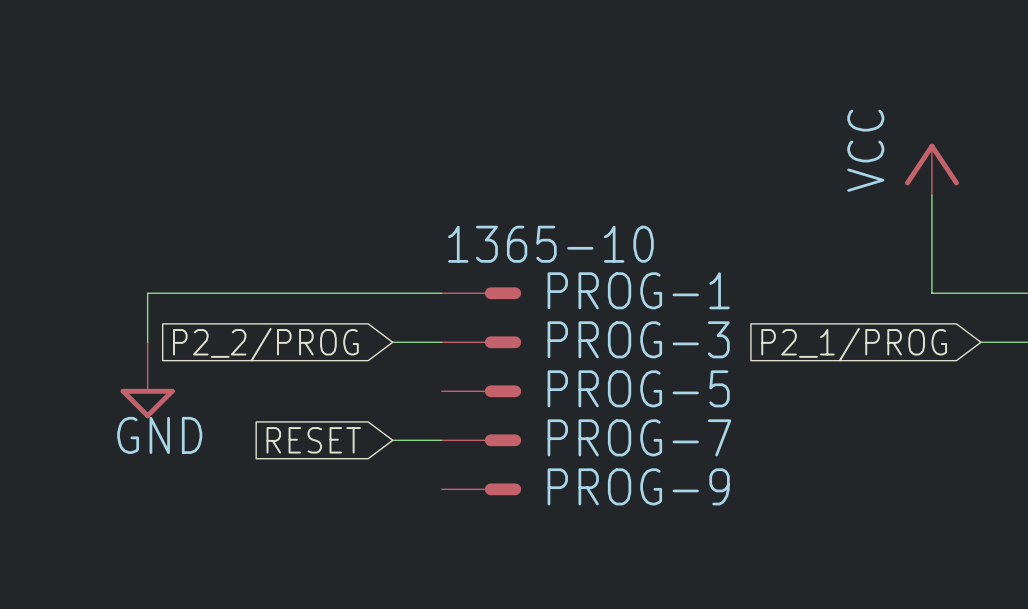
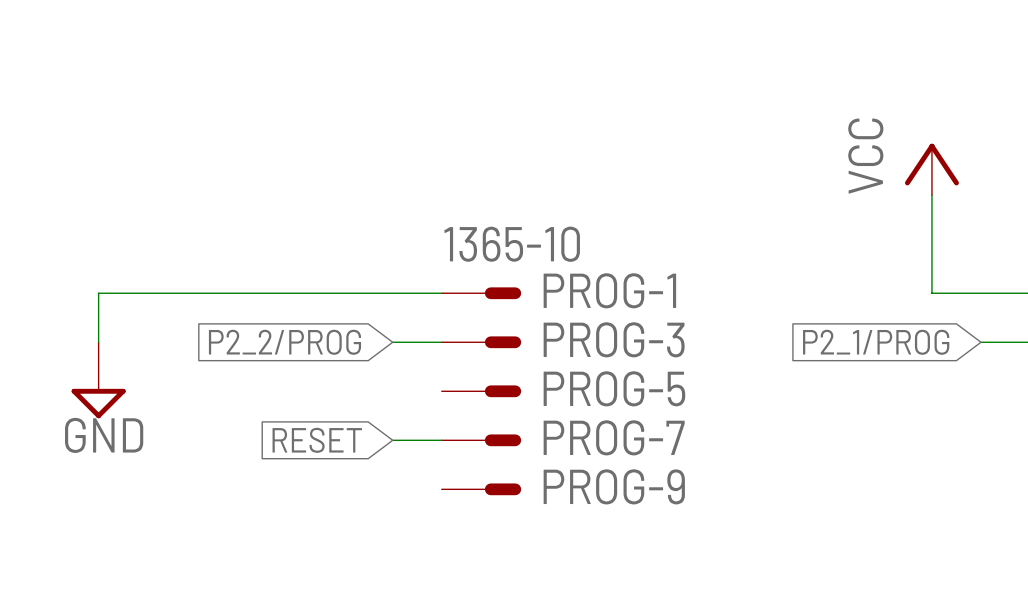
wire: (147, 293) (147, 342) -> (147, 293) (98, 293) (98, 342)
power symbol position: GND (147, 380) -> GND (98, 380)

